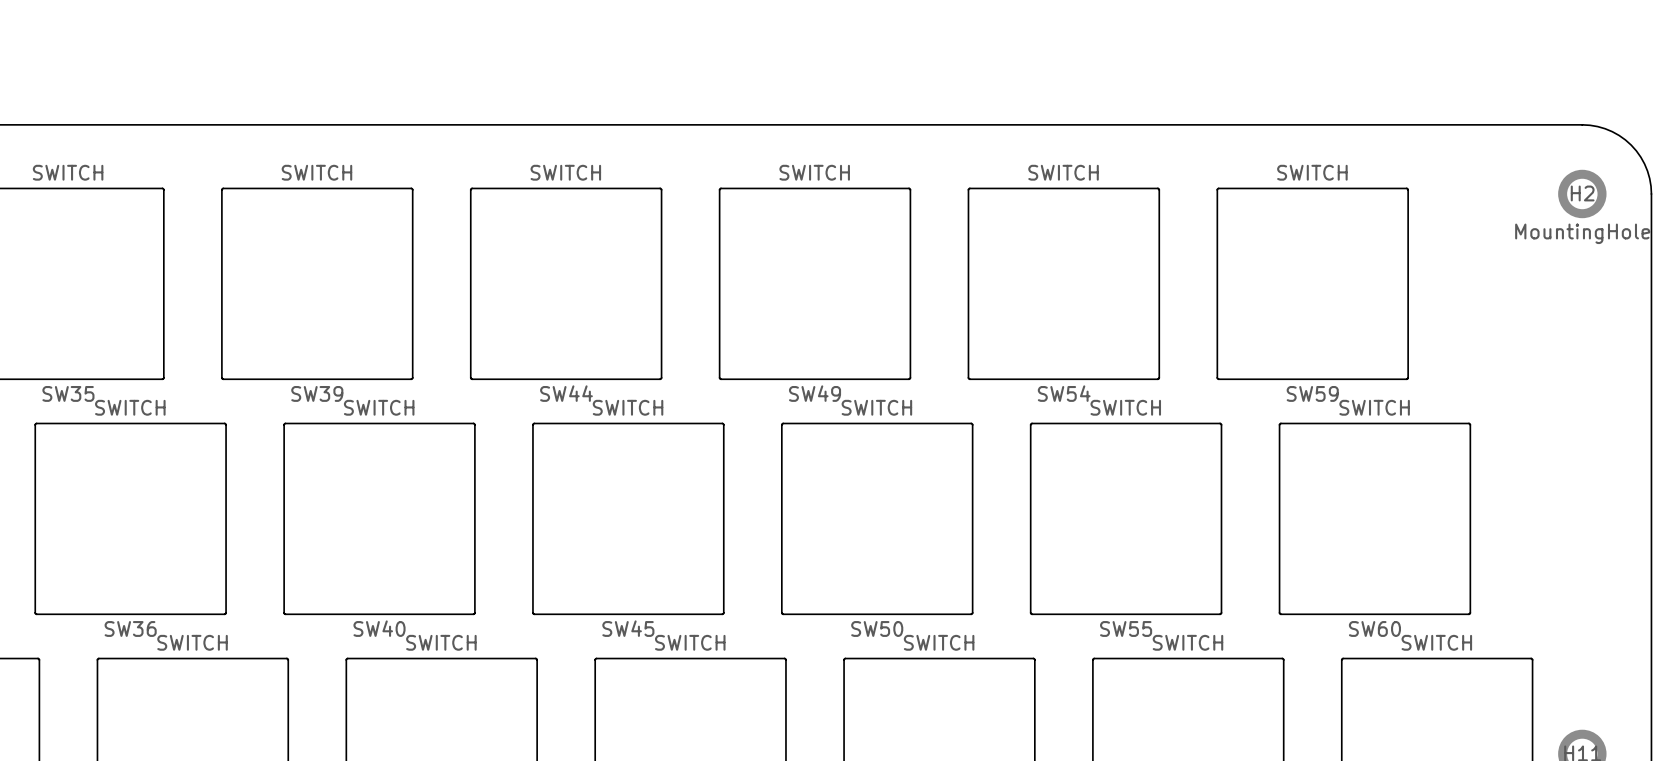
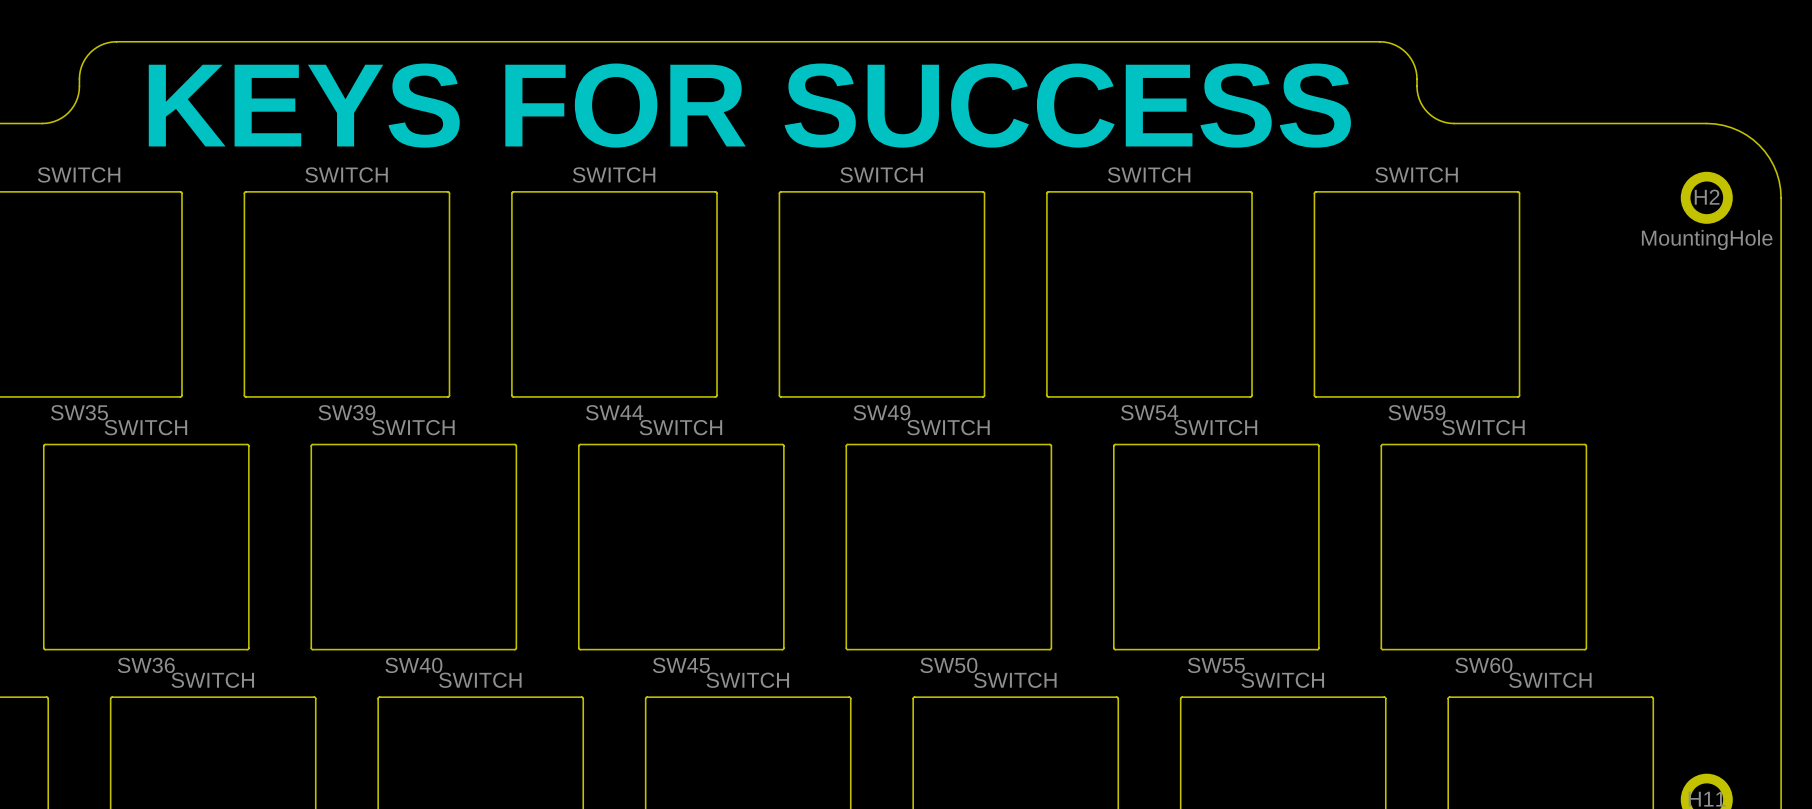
text: none -> KEYS FOR SUCCESS (749, 105)
board edge: (33, 124) (1347, 124) -> (42, 123) (54, 121) (68, 112) (77, 98) (80, 70) (85, 59) (96, 47) (116, 41) (1383, 42) (1399, 47) (1411, 59) (1416, 70) (1417, 94) (1425, 109) (1438, 119) (1454, 123)

